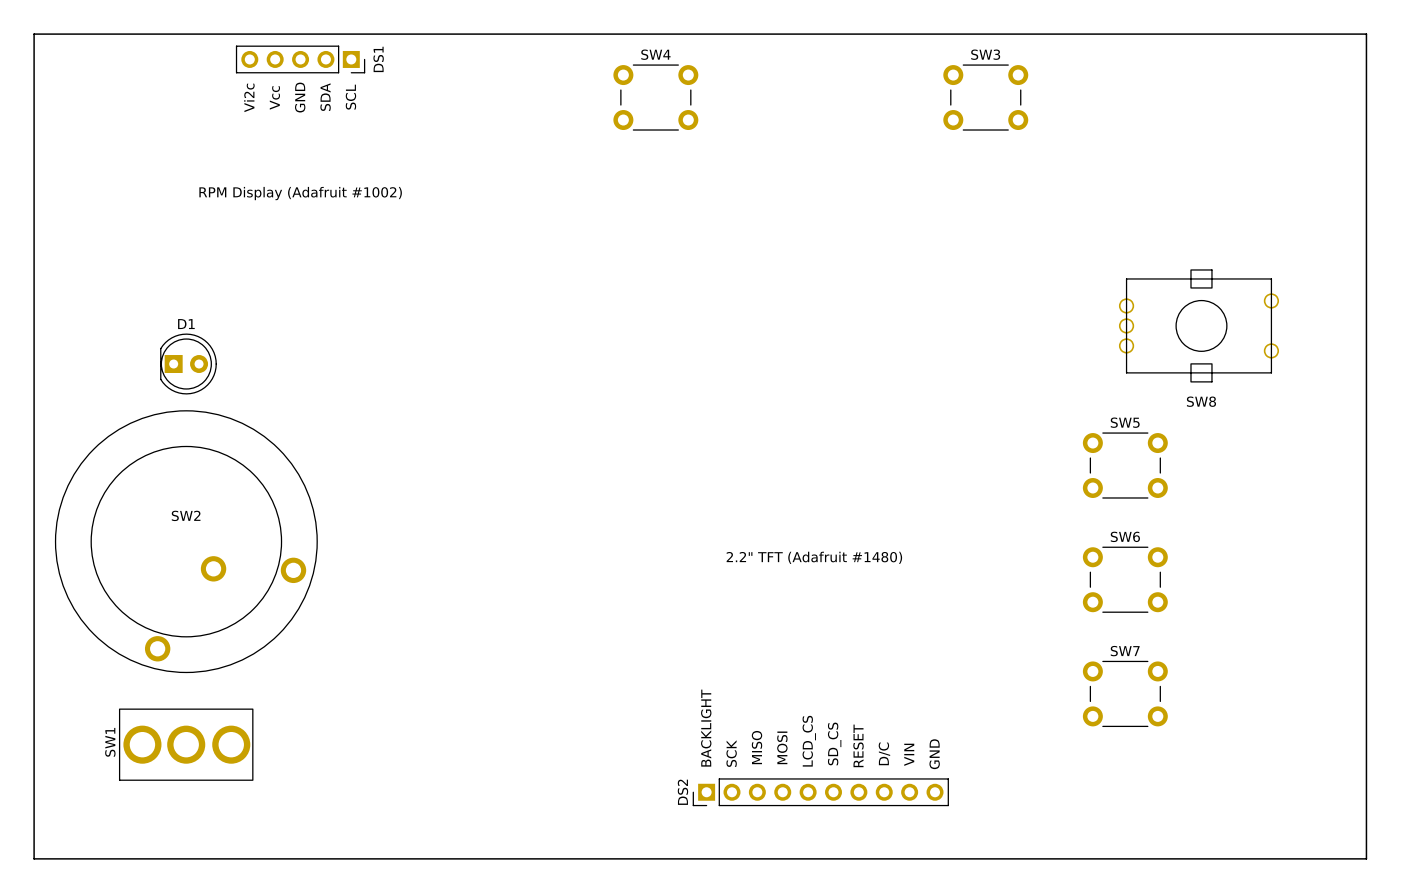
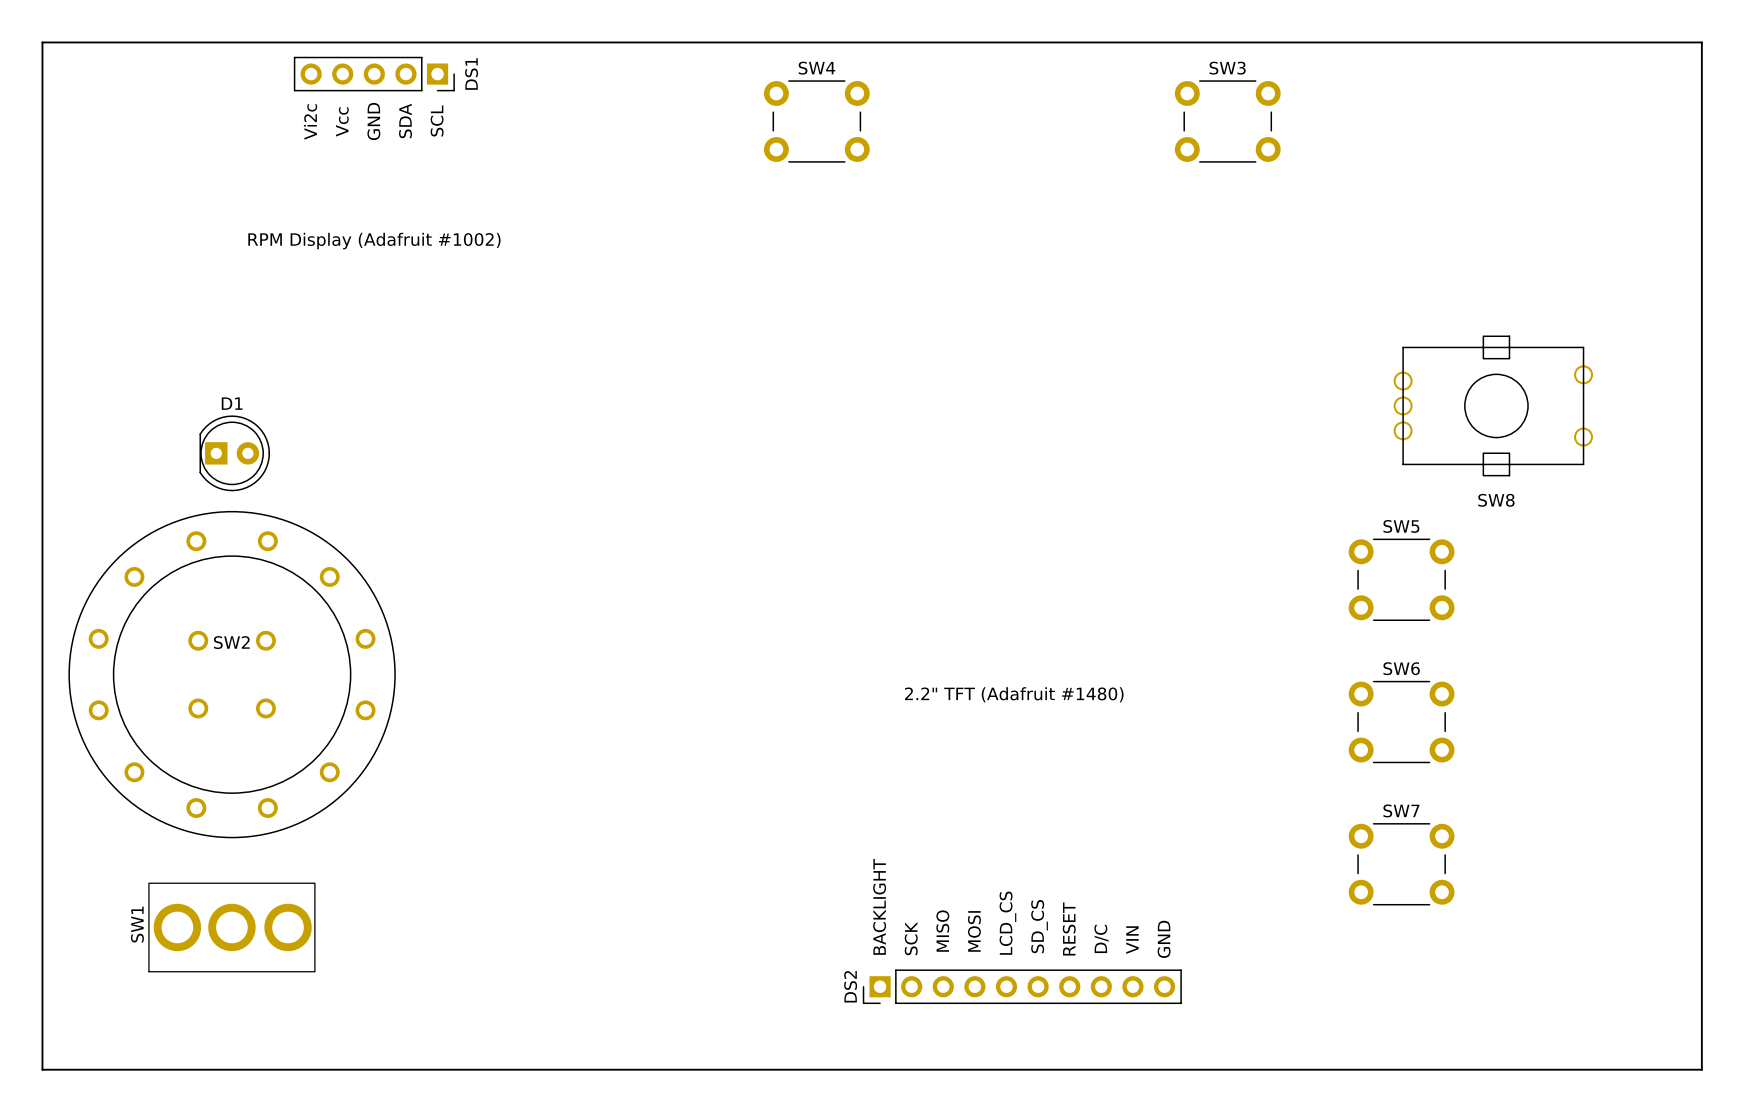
SW2 footprint: [54, 410, 318, 674] -> [68, 510, 396, 839]

